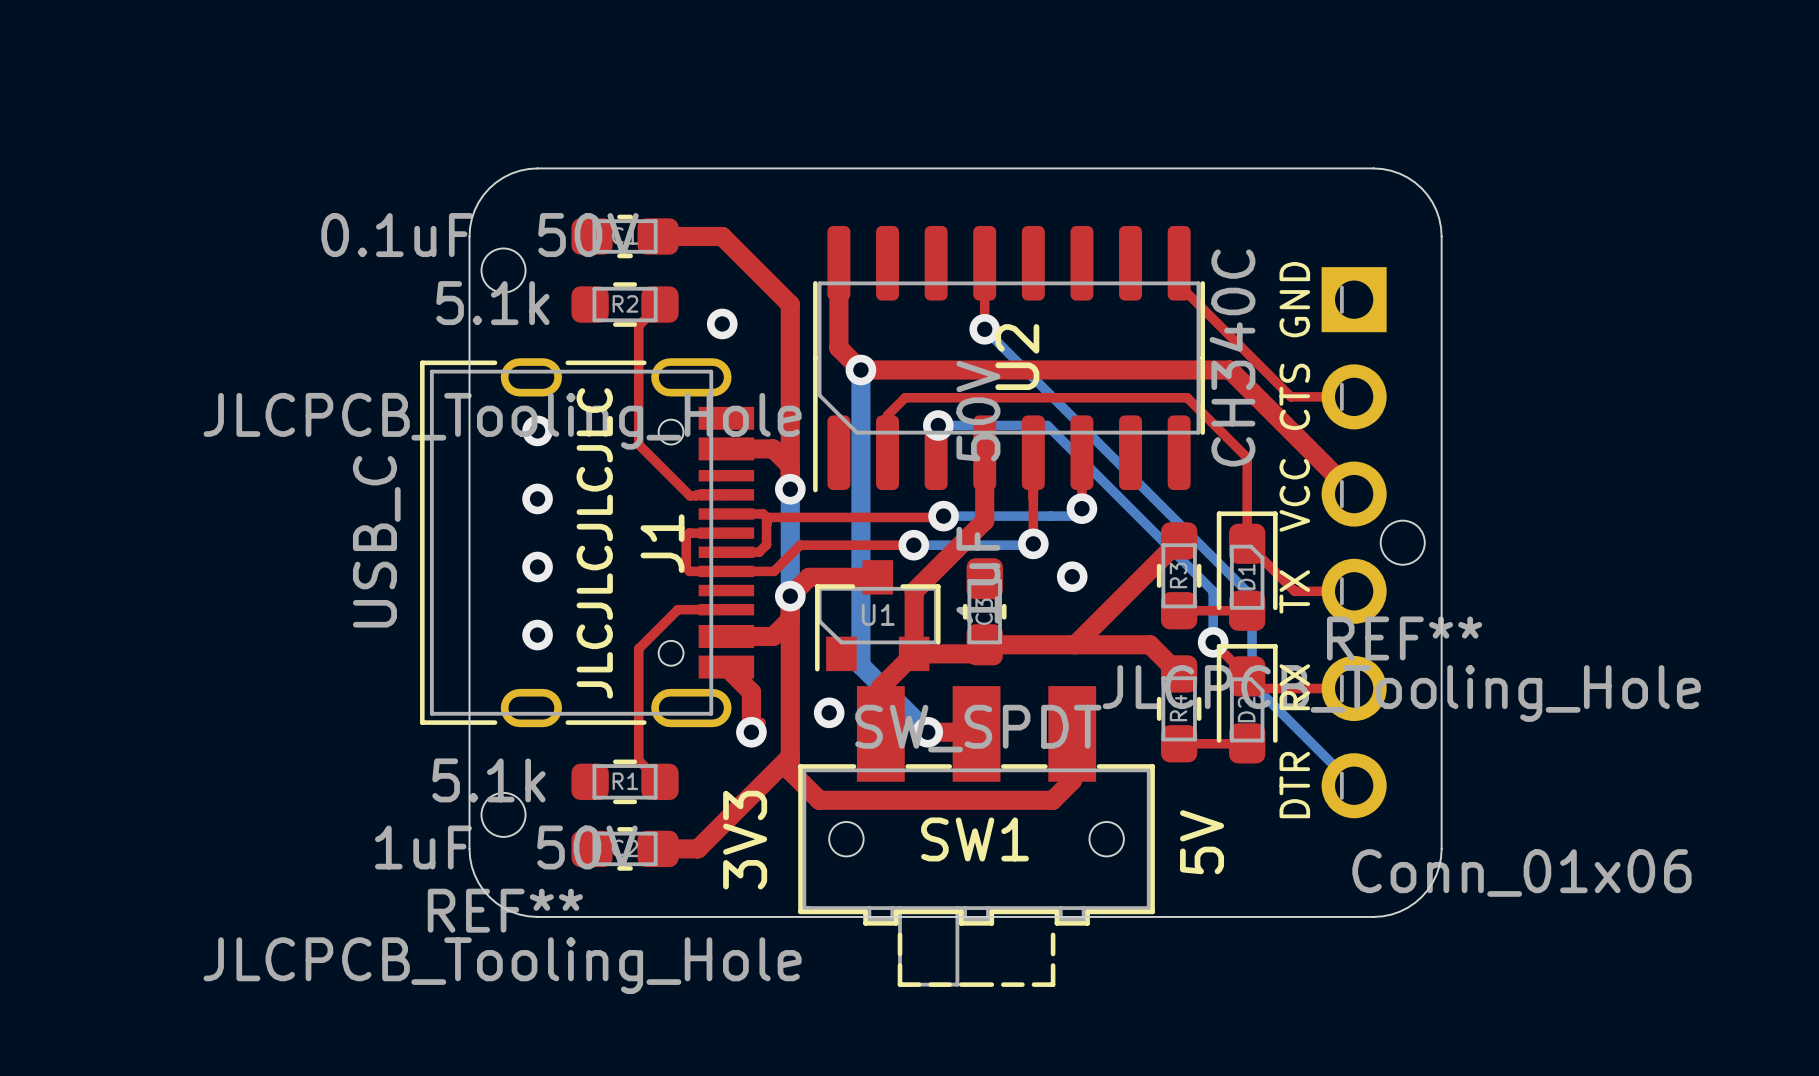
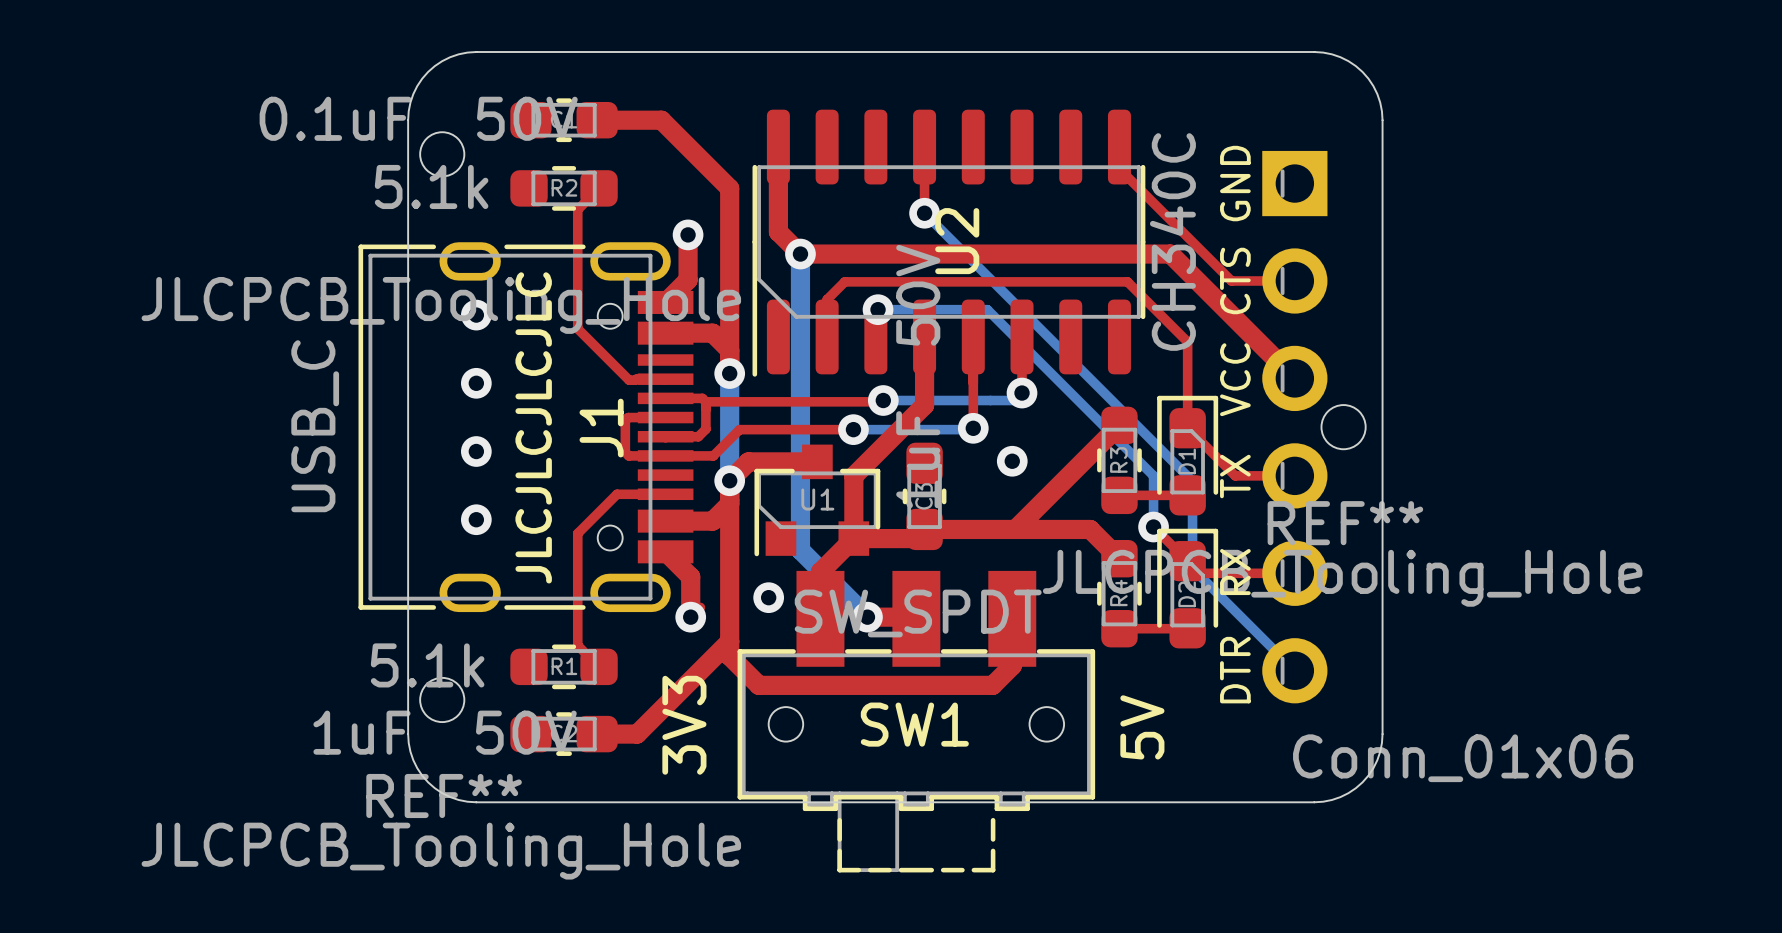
via position: (722, 323) -> (688, 234)
top track: none -> (688, 234) (688, 280) (665, 302)

